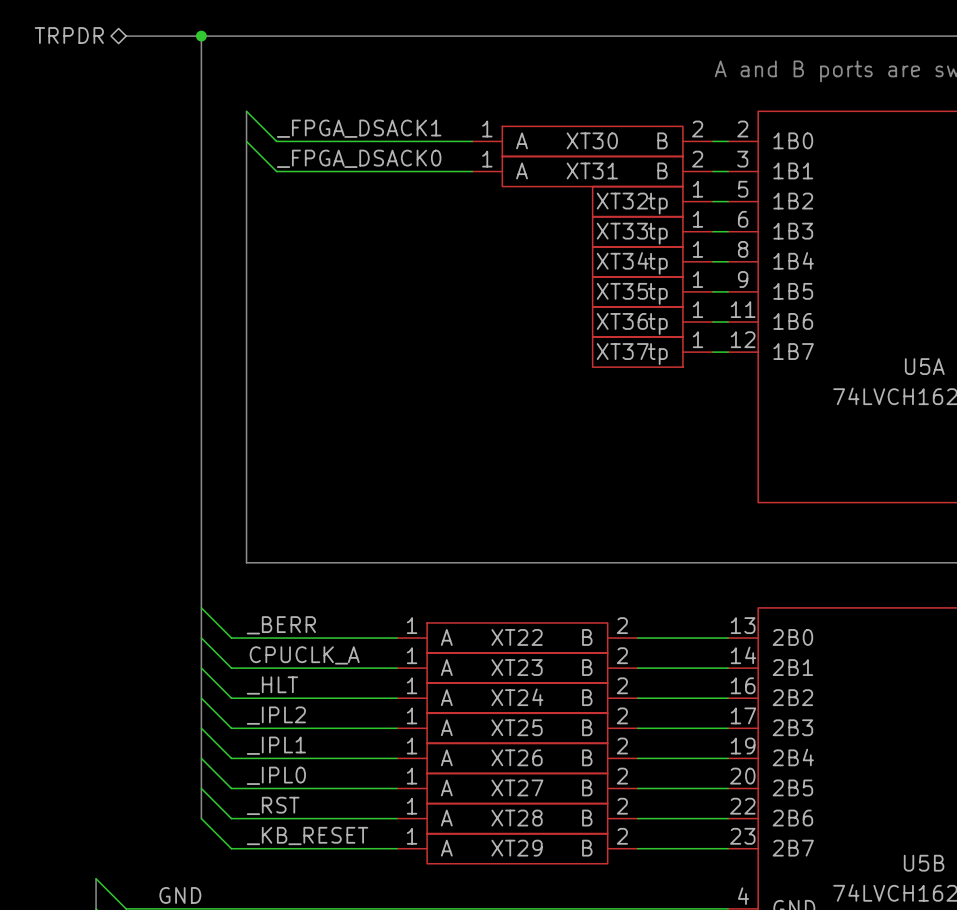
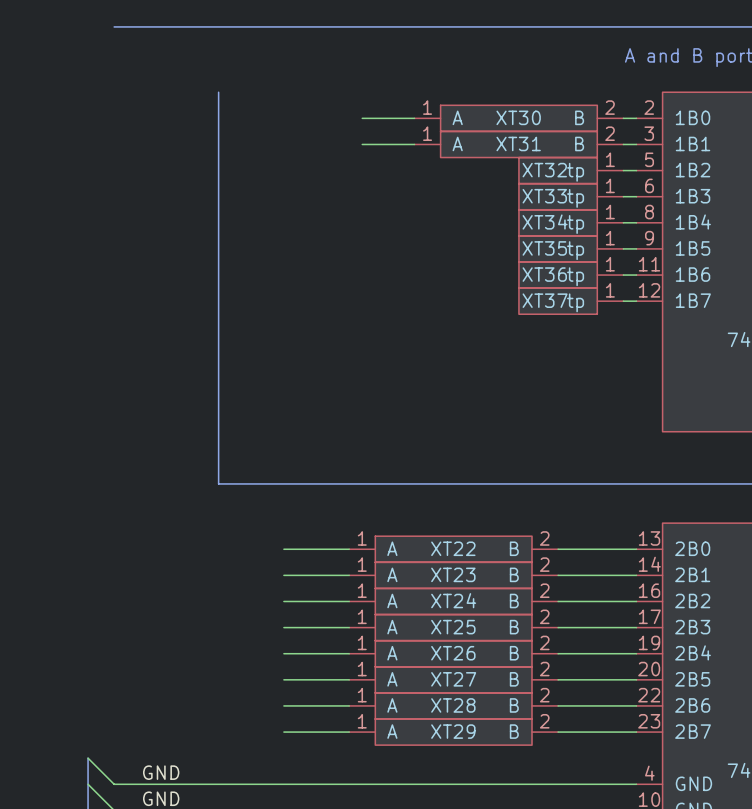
hierarchical label: TRPDR (69, 35) -> none
bus: (201, 36) (201, 818) -> none
junction: (201, 36) -> none
wire: (246, 111) (276, 141) (412, 141) -> none
label: _FPGA_DSACK1 (359, 128) -> none
wire: (246, 141) (276, 171) (412, 171) -> none
label: _FPGA_DSACK0 (359, 158) -> none
wire: (201, 607) (231, 638) (321, 638) -> none
label: _BERR (281, 625) -> none
wire: (201, 638) (231, 668) (321, 668) -> none
label: CPUCLK_A (304, 655) -> none
wire: (201, 668) (231, 698) (321, 698) -> none
label: _HLT (272, 685) -> none
wire: (201, 698) (231, 728) (321, 728) -> none
label: _IPL2 (276, 715) -> none
wire: (201, 728) (231, 758) (321, 758) -> none
label: _IPL1 (276, 745) -> none
wire: (201, 758) (231, 788) (321, 788) -> none
label: _IPL0 (276, 775) -> none
wire: (201, 788) (231, 818) (321, 818) -> none
label: _RST (273, 805) -> none
wire: (201, 818) (231, 848) (321, 848) -> none
label: _KB_RESET (307, 835) -> none

